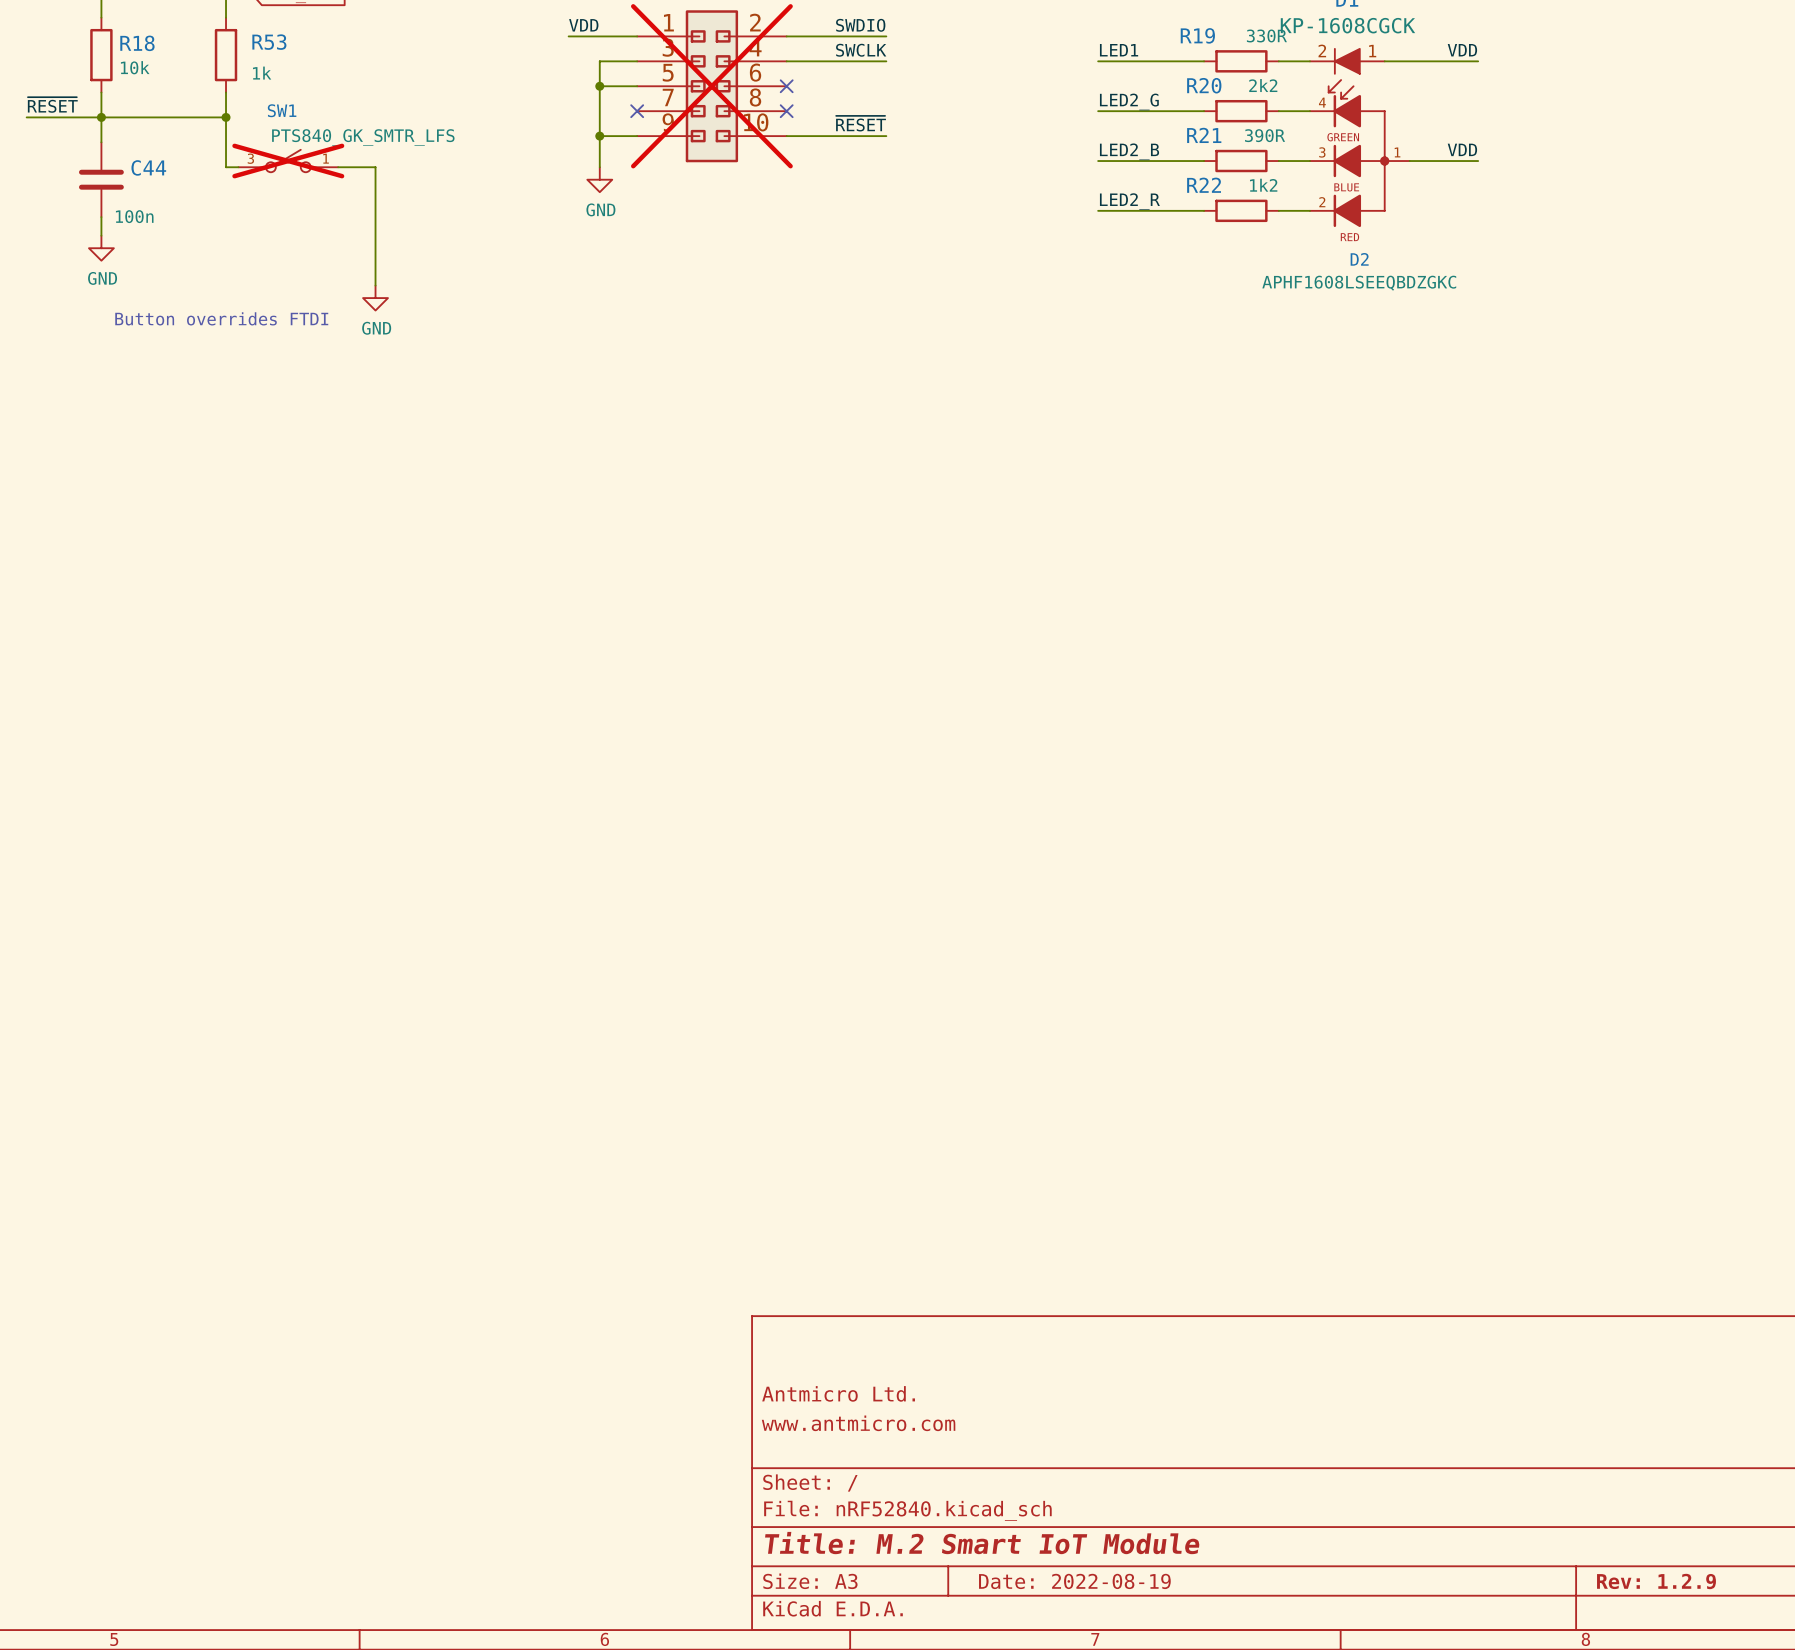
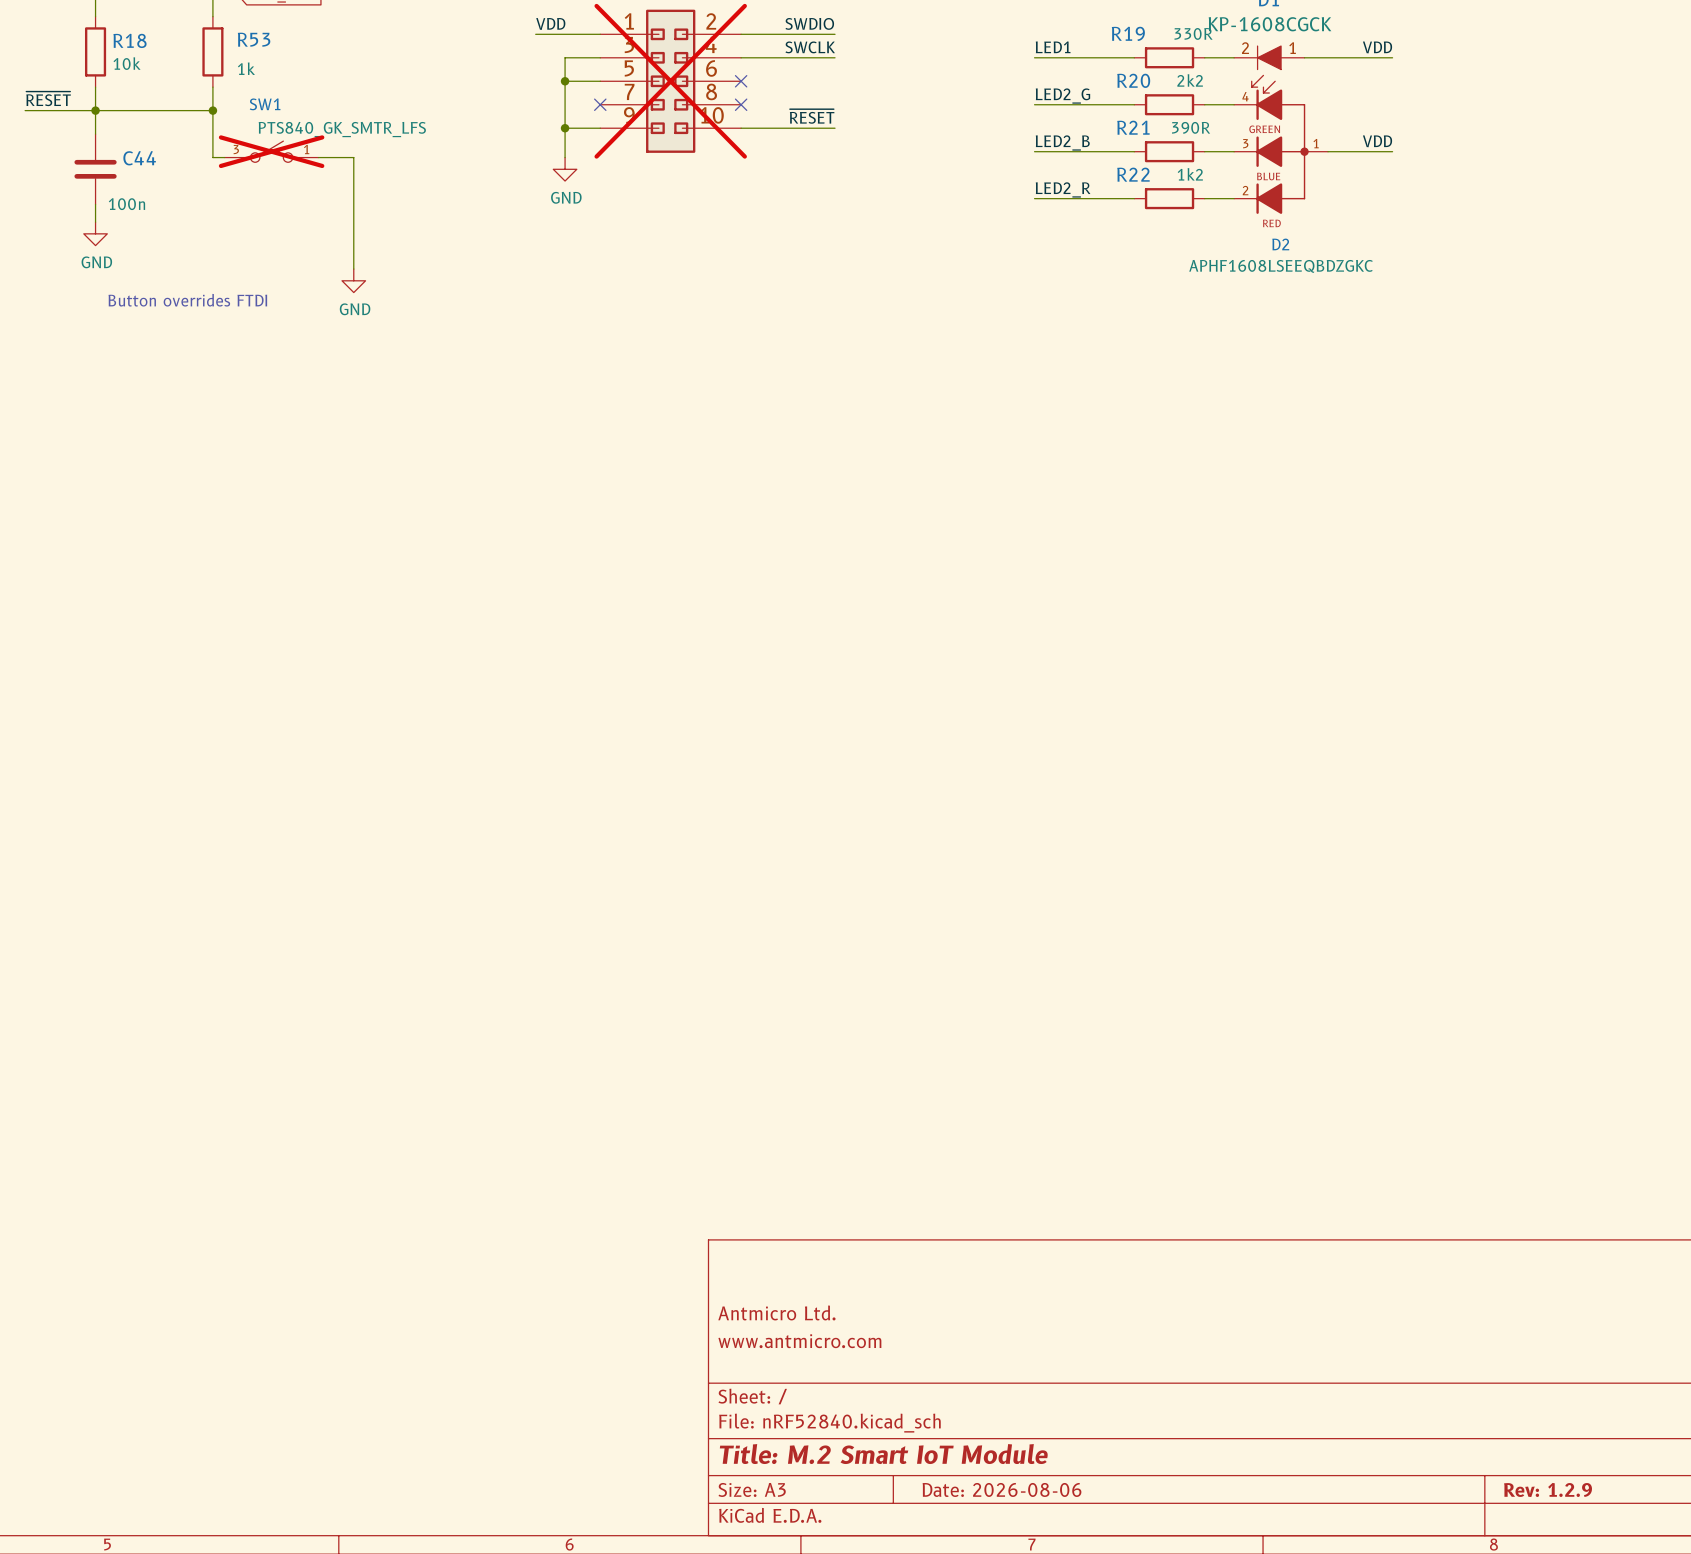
title block: Date: 2022-08-19 (1074, 1581) -> Date: 2026-08-06 (1002, 1489)

